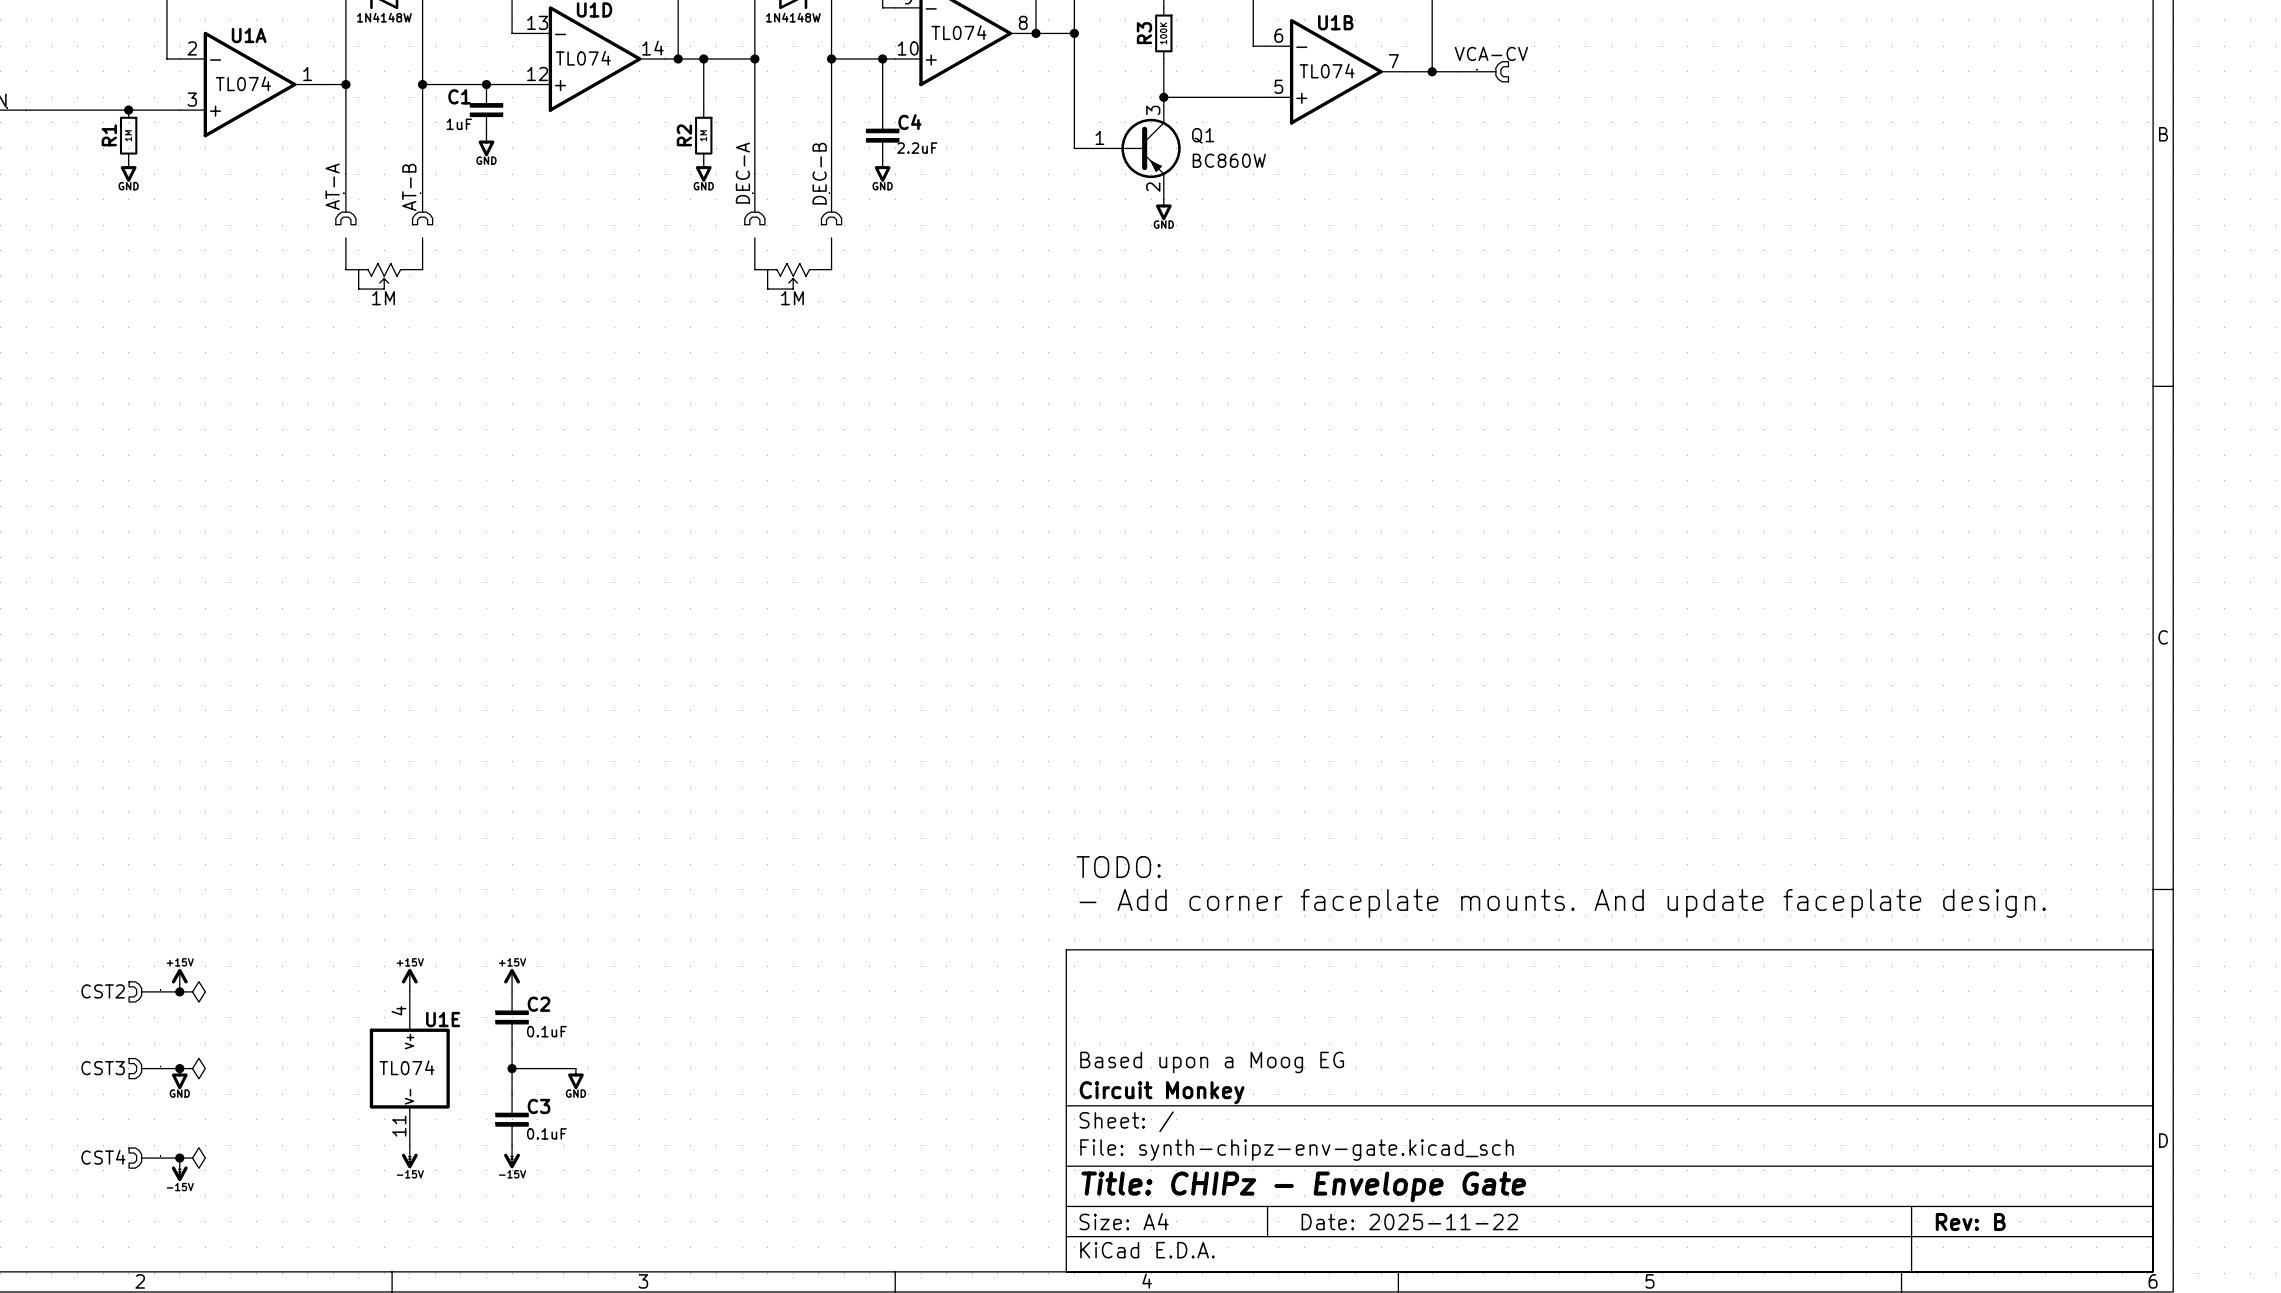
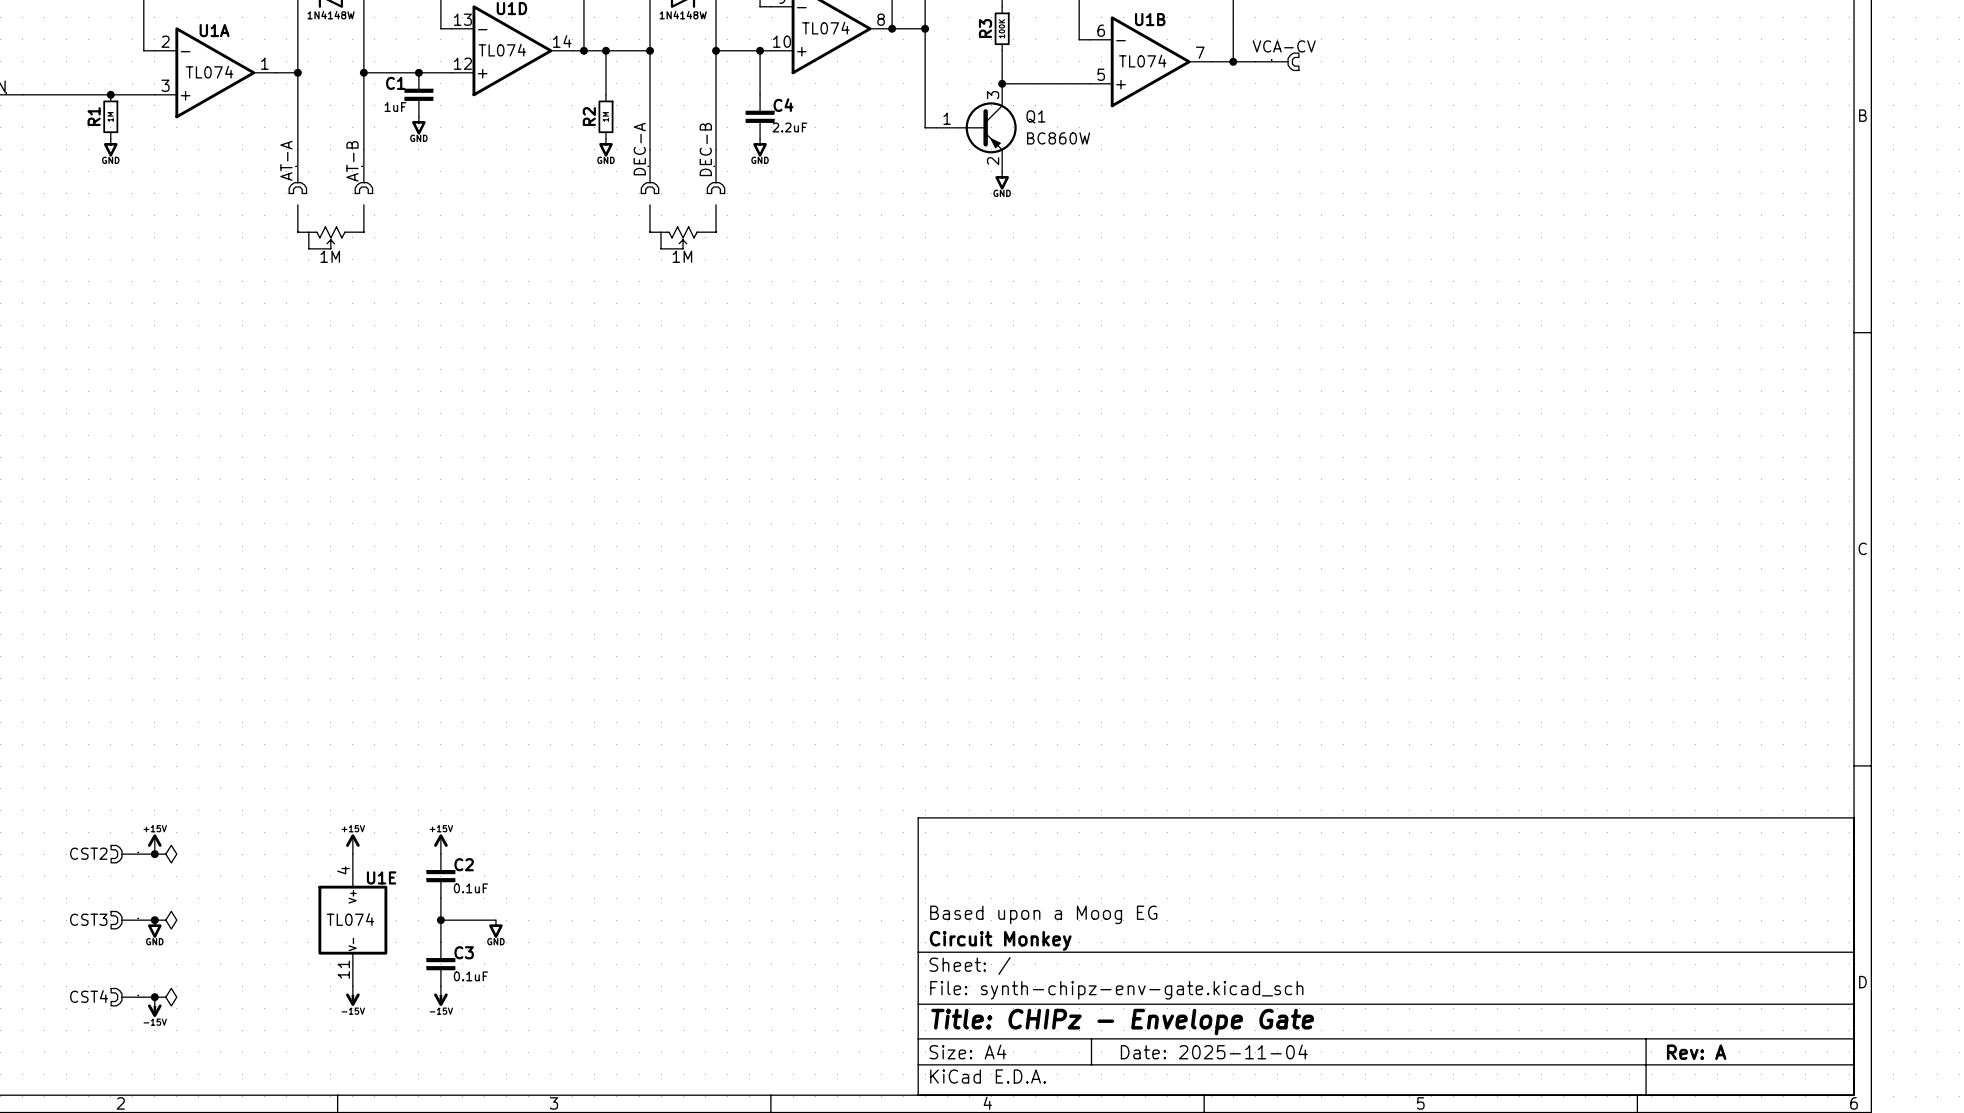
text: TODO: (1118, 867) -> none
text: - Add corner faceplate mounts. And update faceplate design. (1562, 903) -> none
title block: Date: 2025-11-22 (1409, 1221) -> Date: 2025-11-04 (1214, 1051)
title block: Rev: B (1970, 1221) -> Rev: A (1696, 1052)

